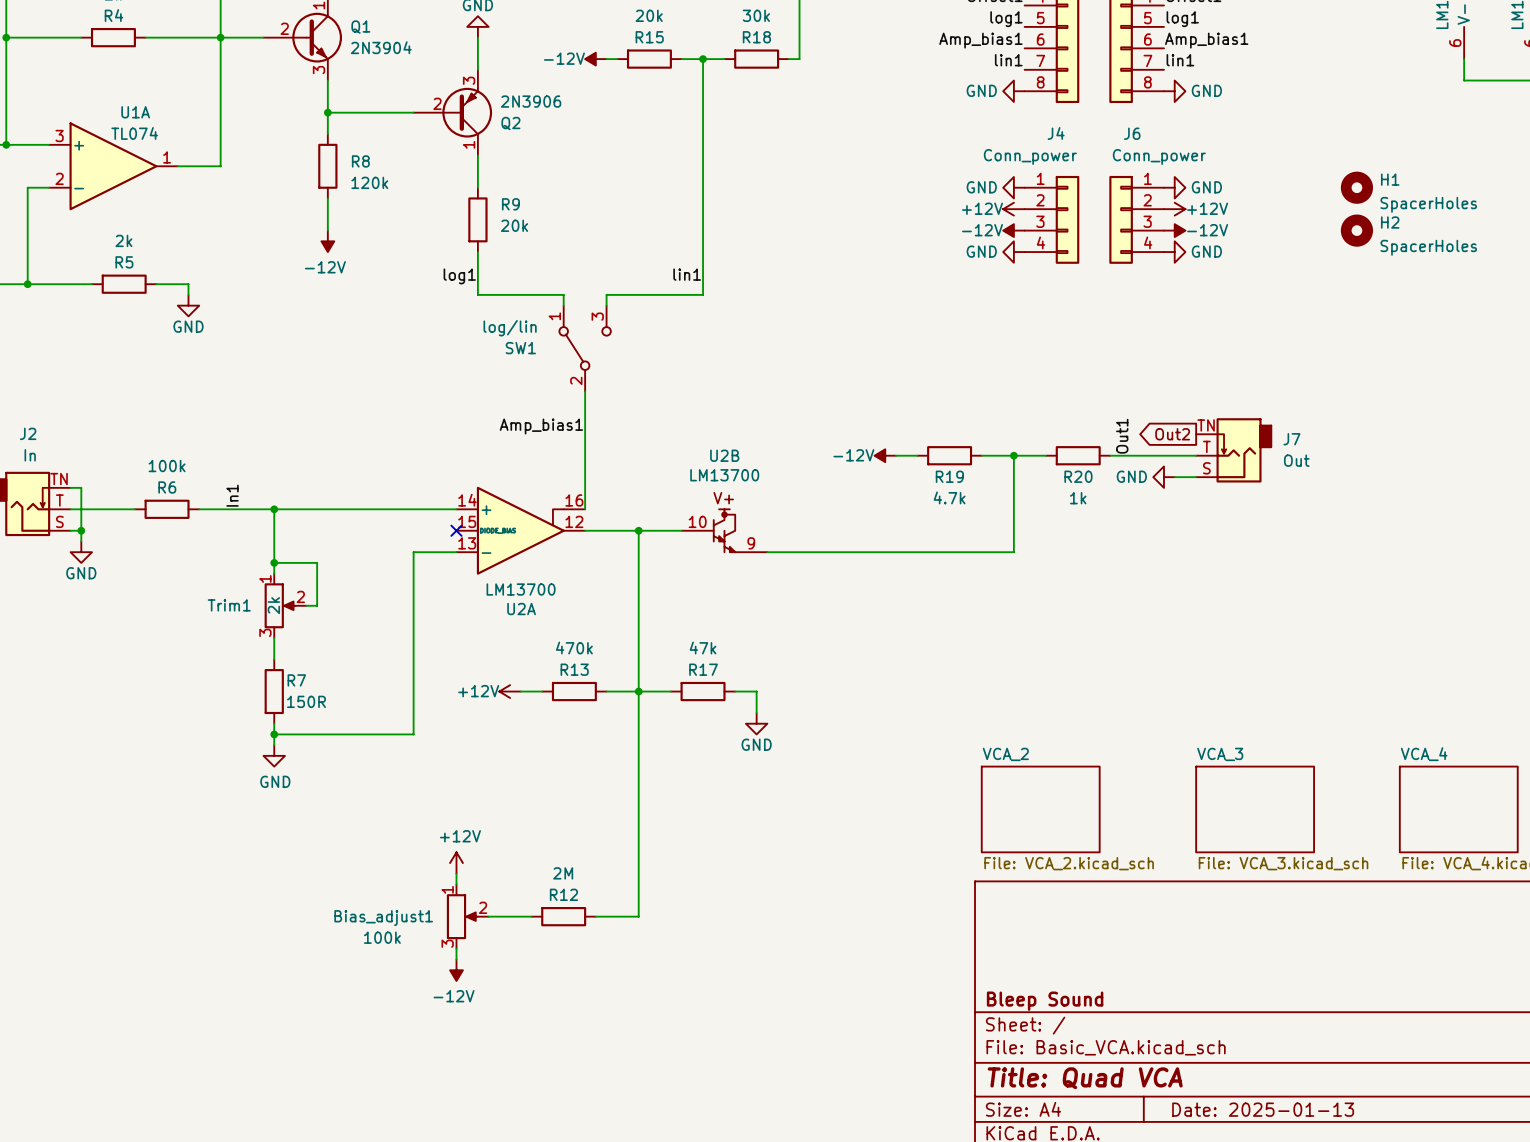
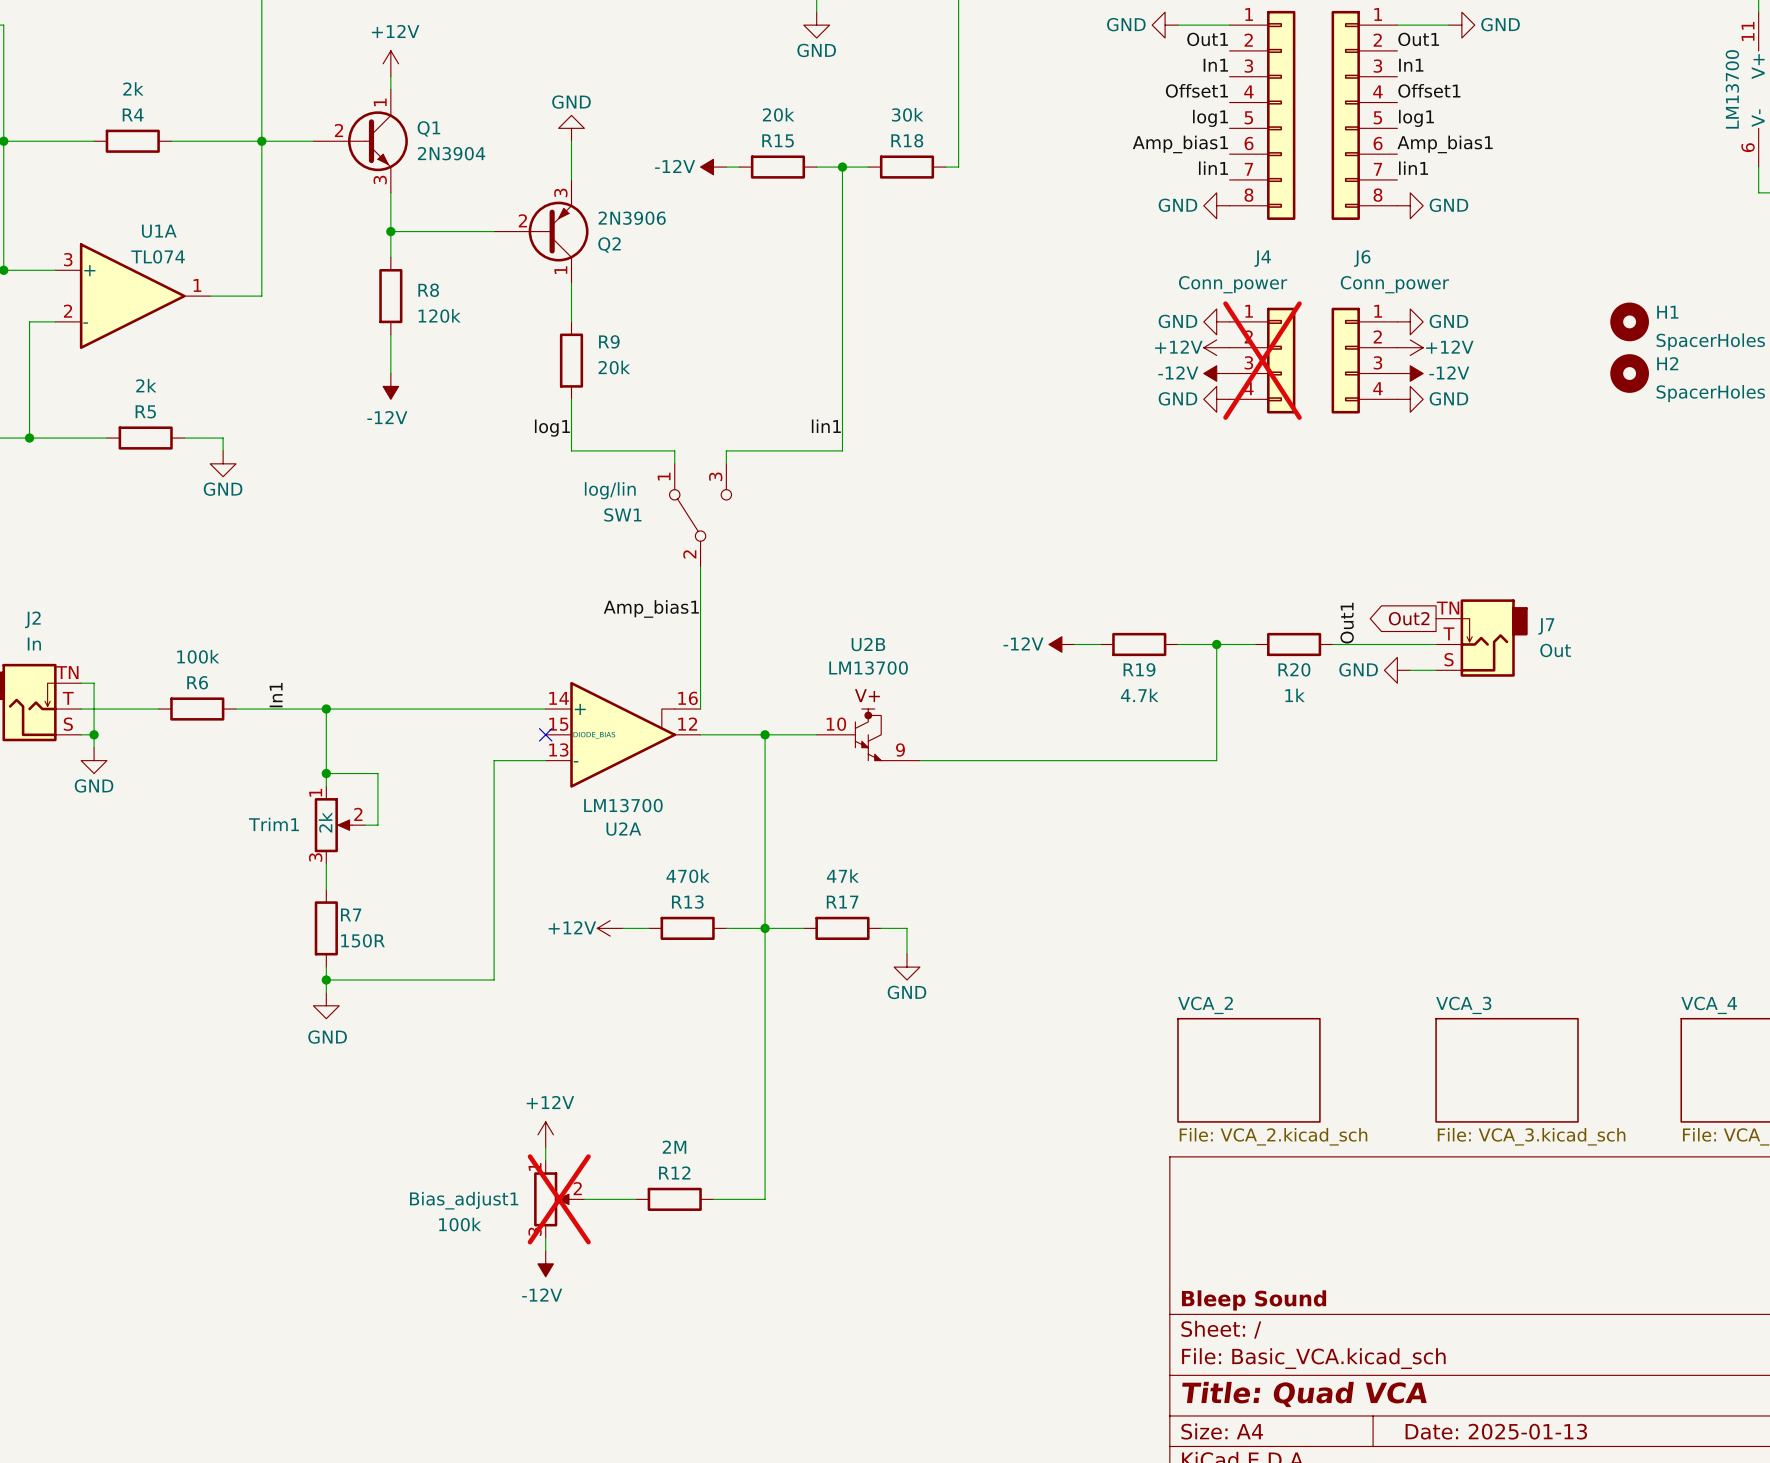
J4 do-not-place cross: none -> (1262, 360)
Bias_adjust1 do-not-place cross: none -> (559, 1199)

